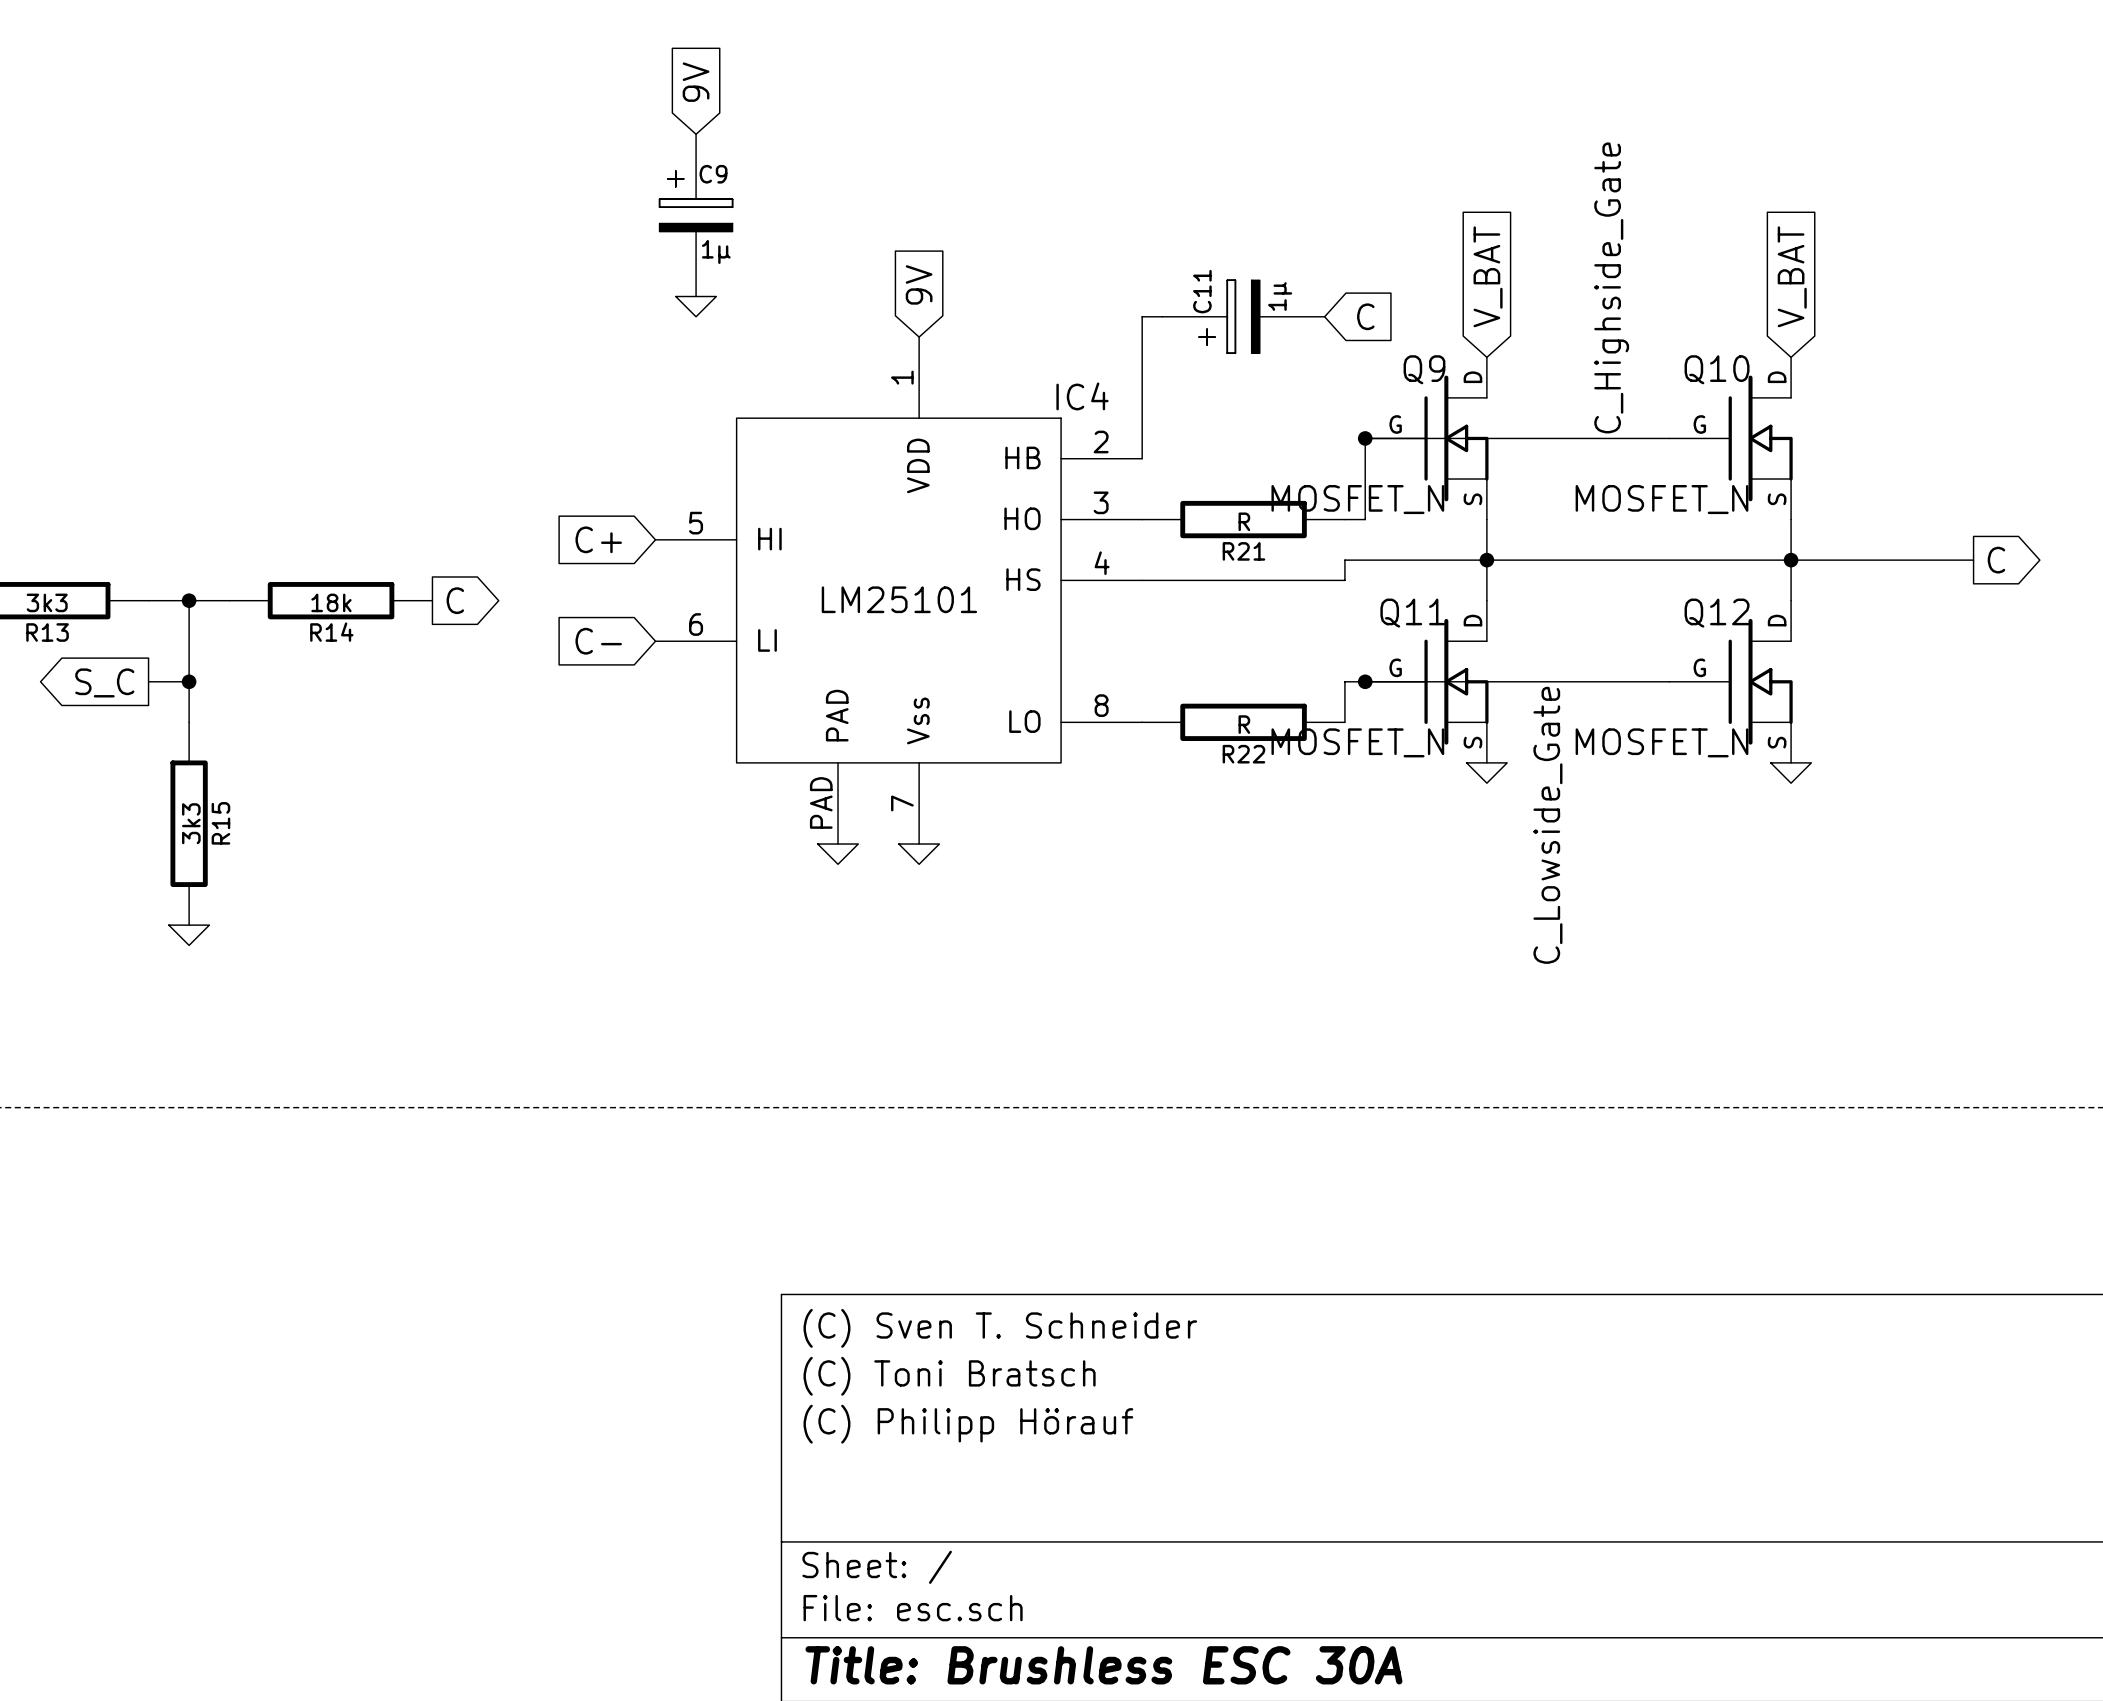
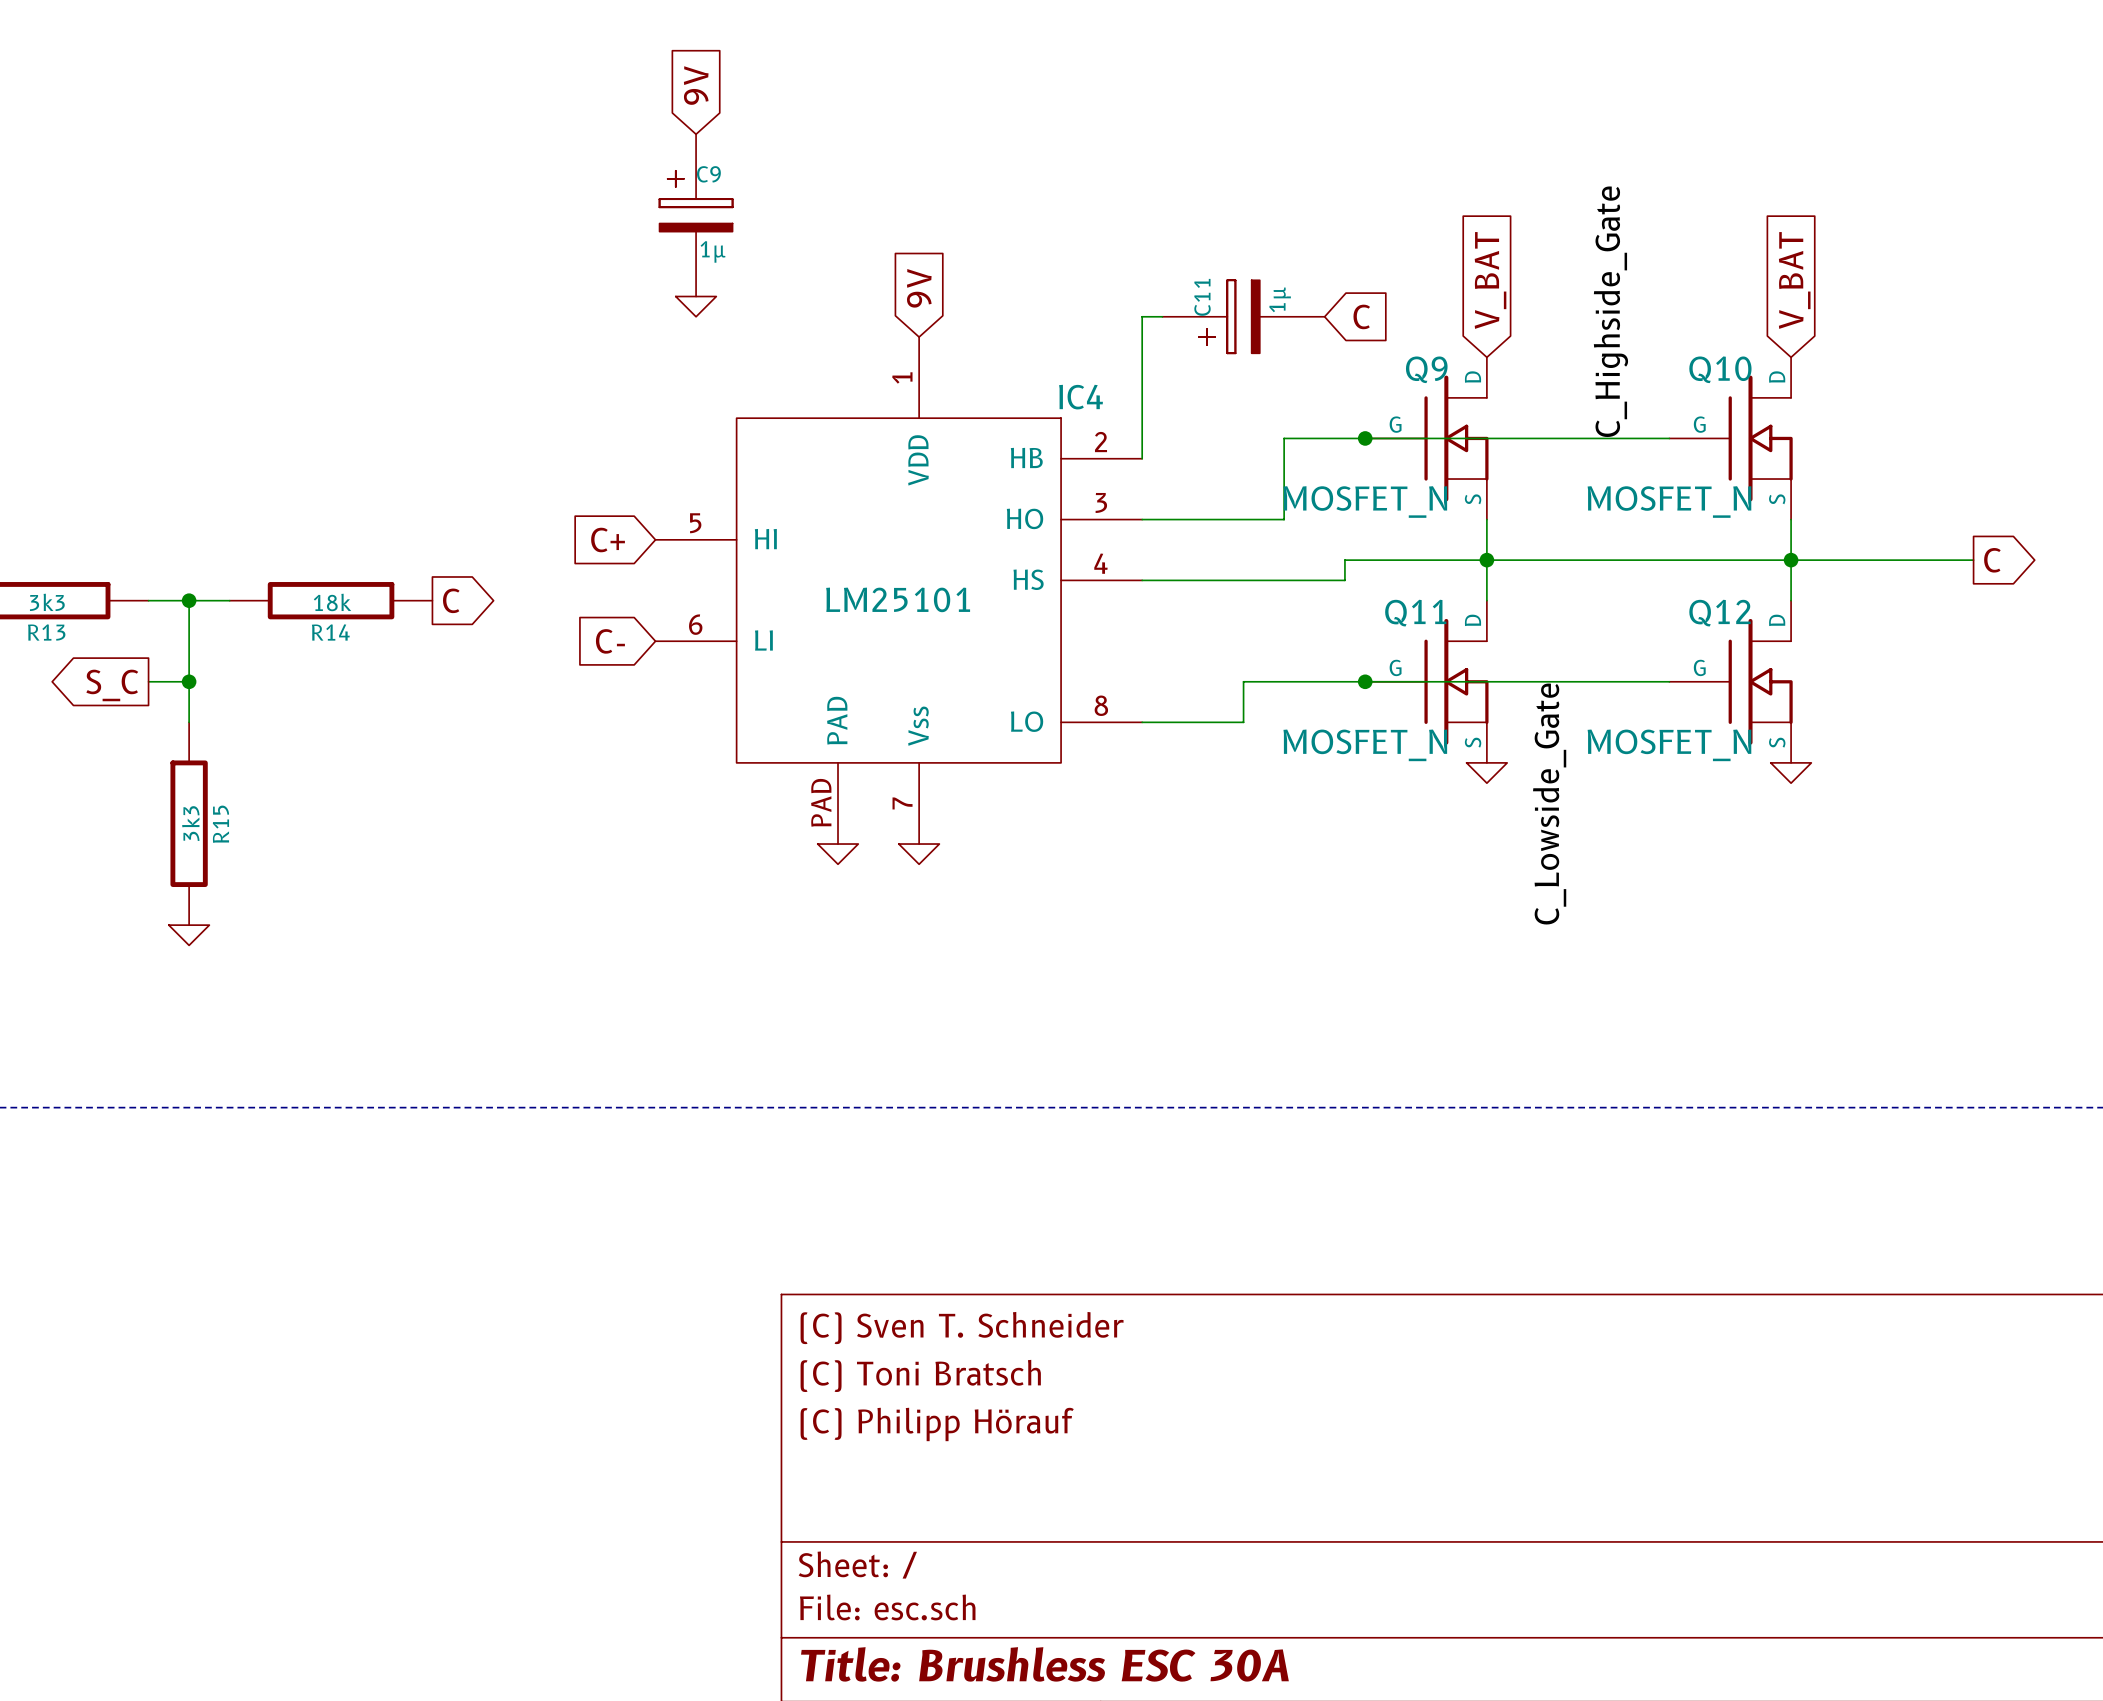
wire: (1365, 438) (1365, 519) (1344, 519) -> (1365, 438) (1284, 438) (1284, 519) (1142, 519)
R21: R (1243, 519) -> none
wire: (1344, 681) (1344, 722) -> (1344, 681) (1243, 681) (1243, 722) (1142, 722)
R22: R (1243, 722) -> none

